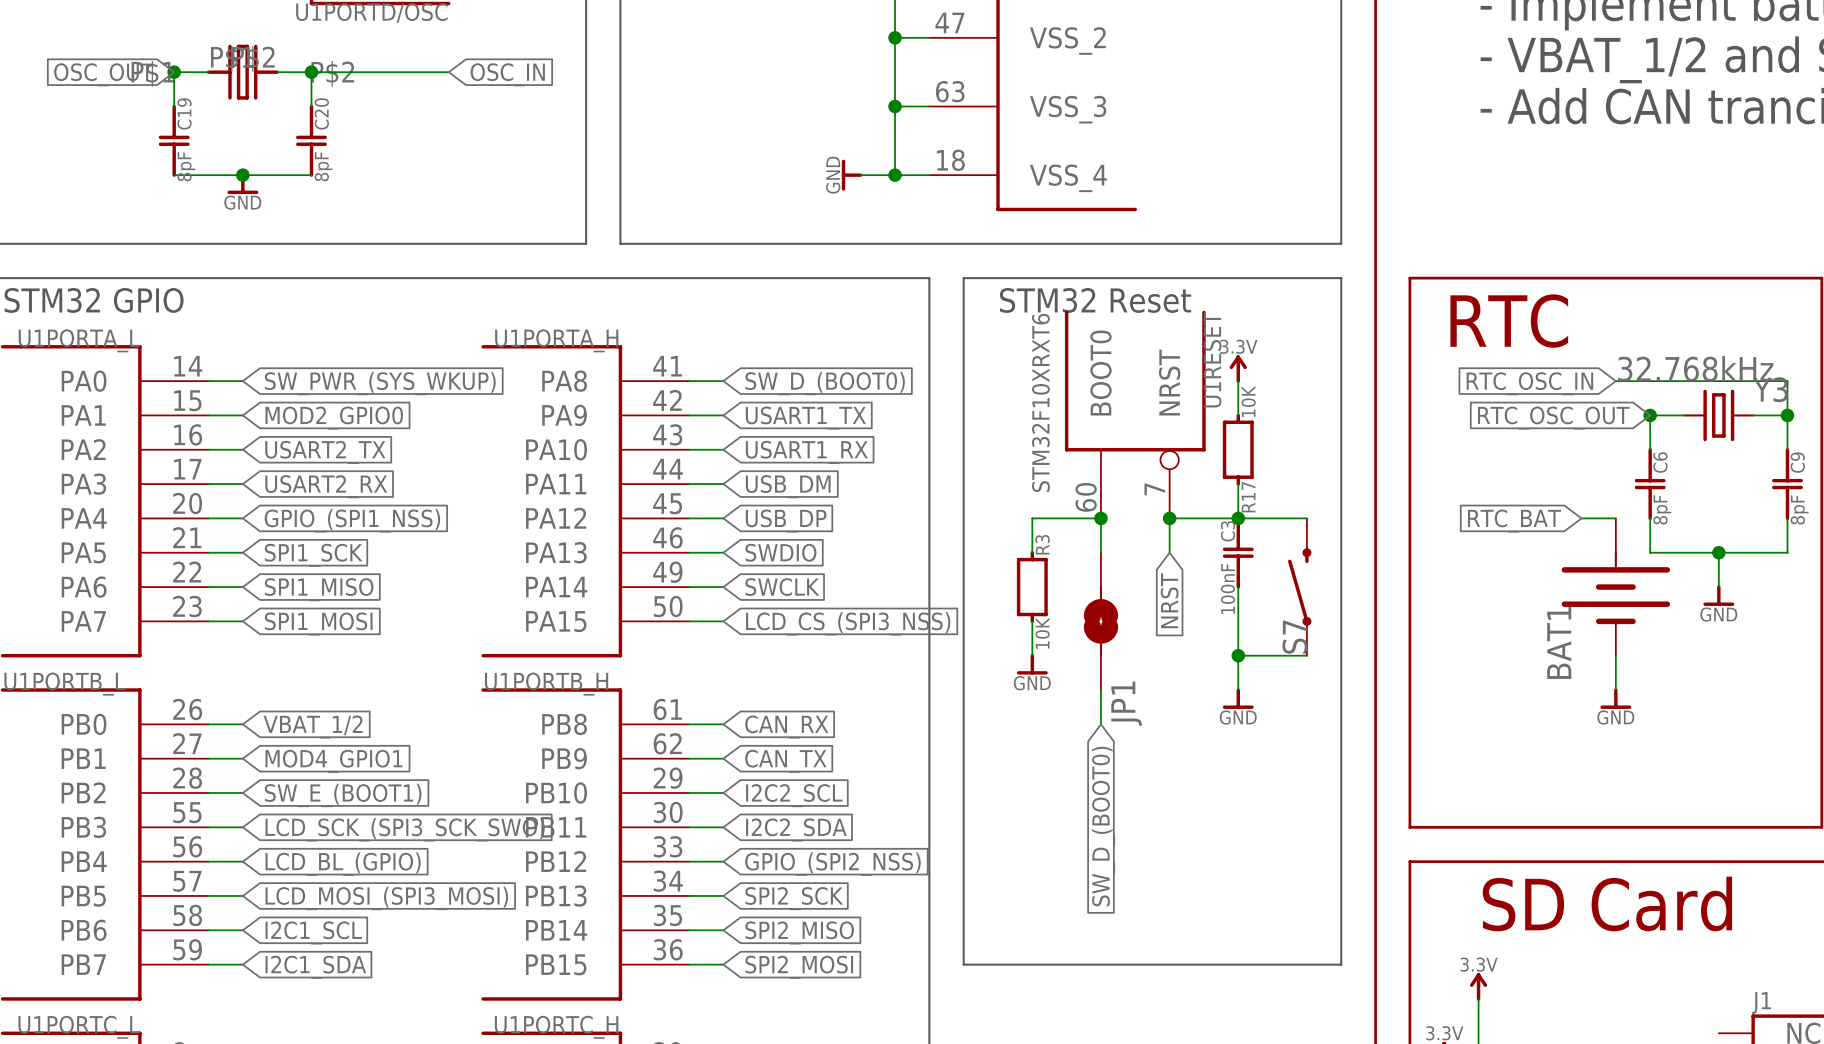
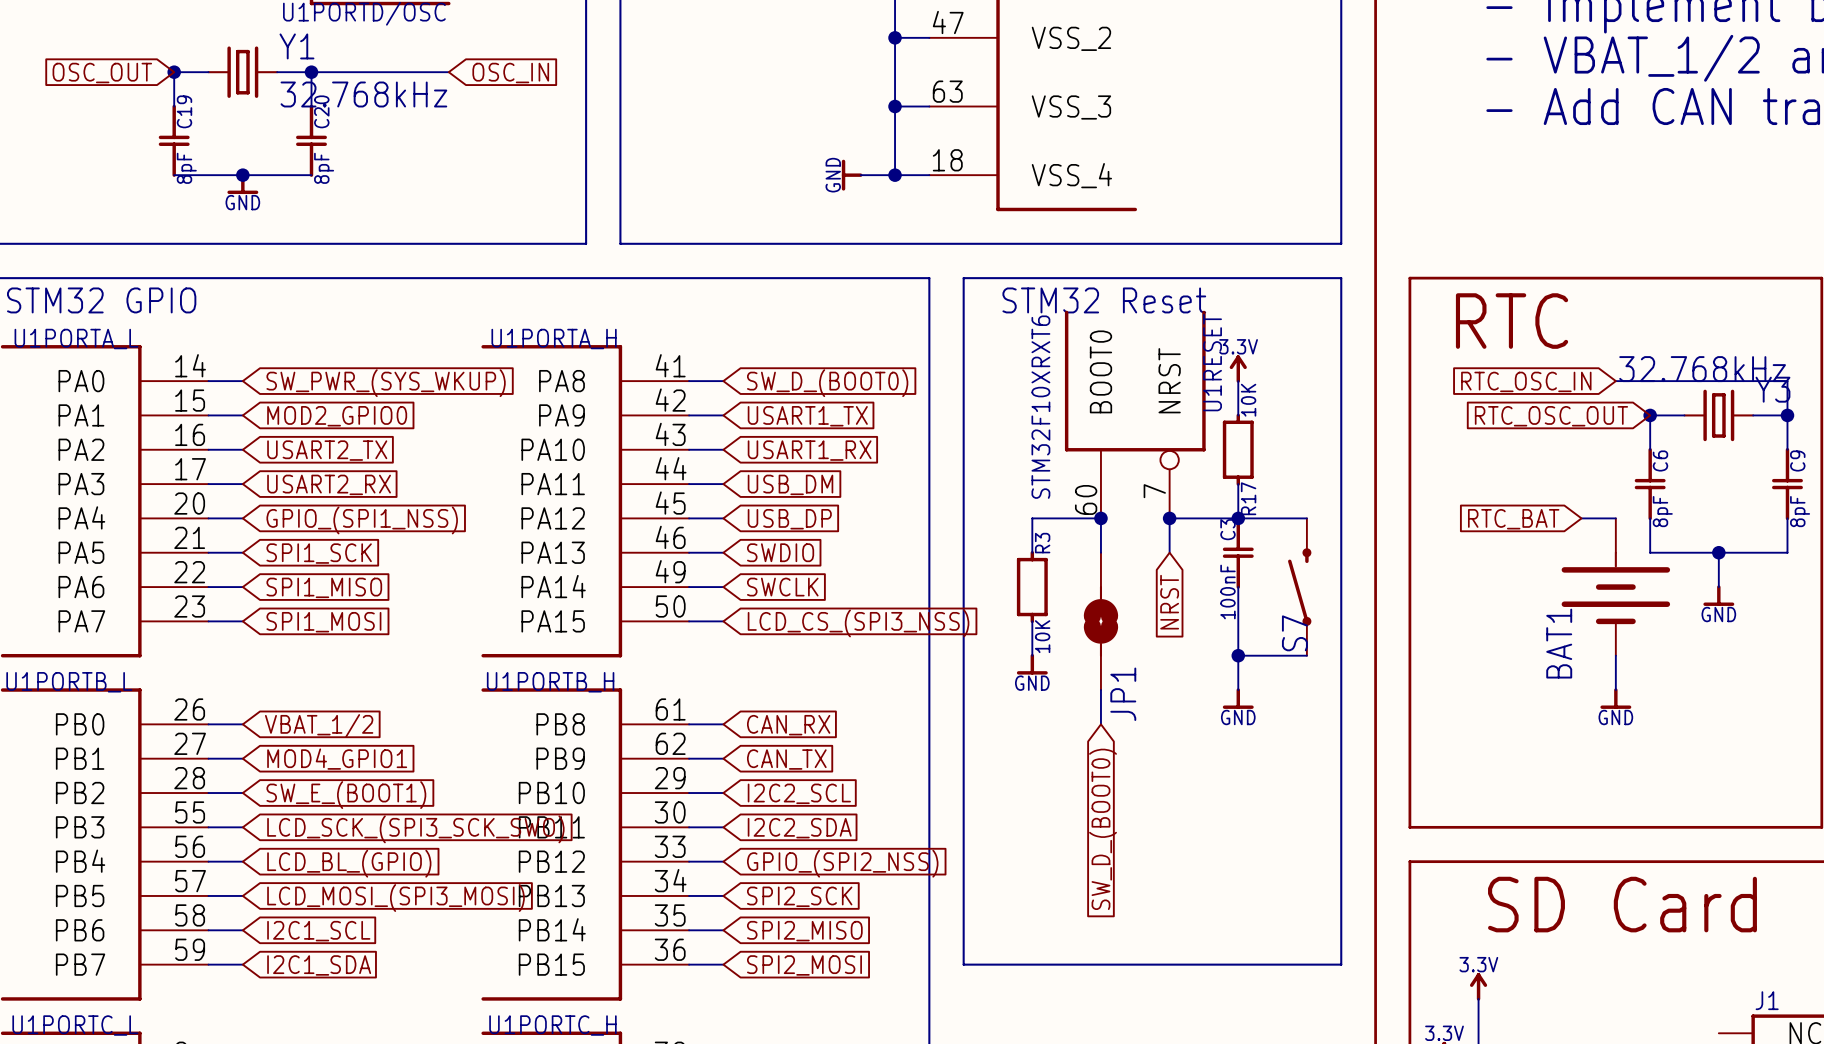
part: (242, 72) -> none
Y1: none -> 32.768kHz (242, 72)

